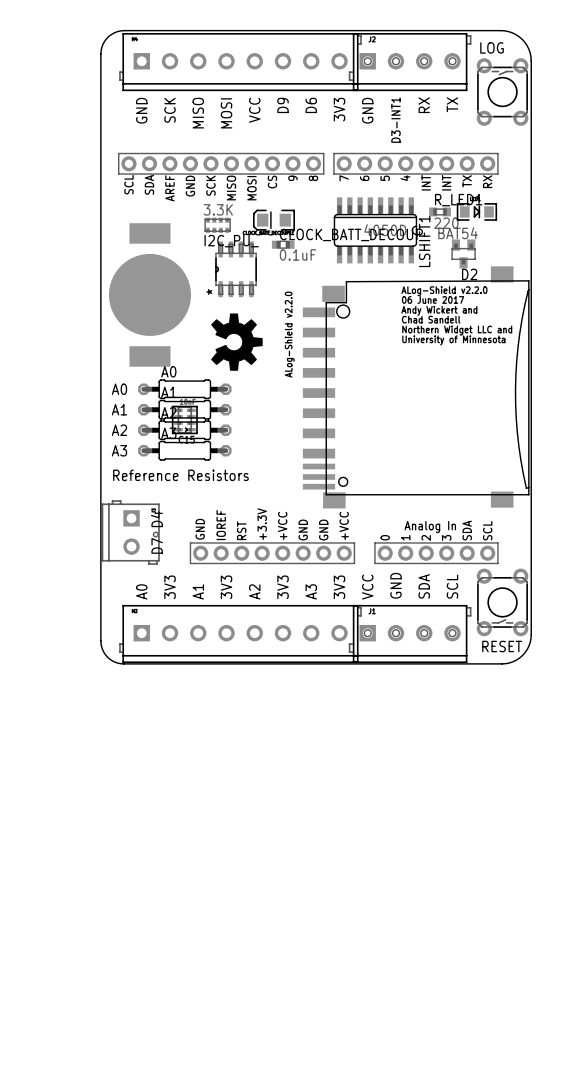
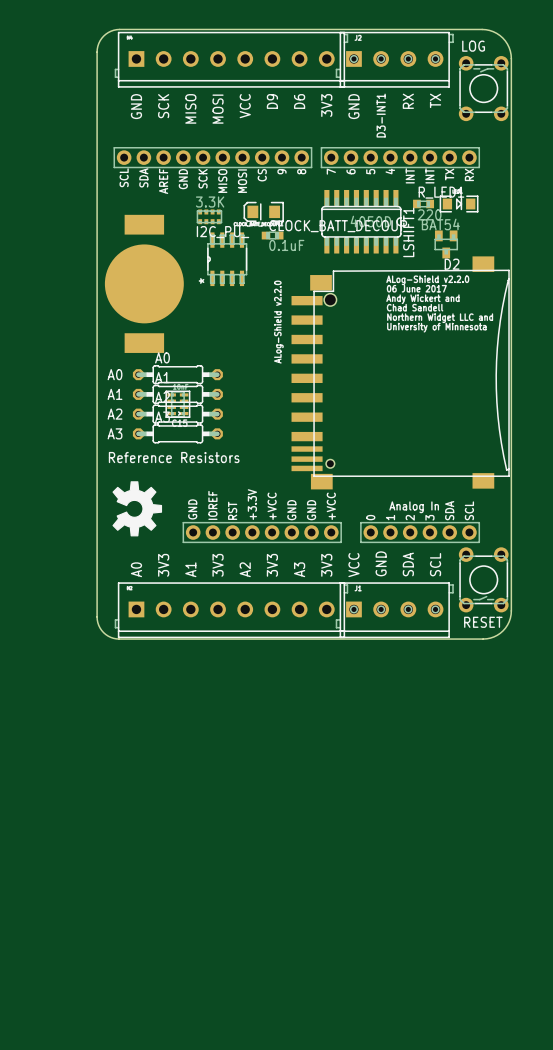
drawing: [211, 313, 263, 371] -> none
drawing: none -> [112, 481, 163, 537]
text: D4 (156, 519) -> none
part: (130, 532) -> none
text: D7 (157, 545) -> none

